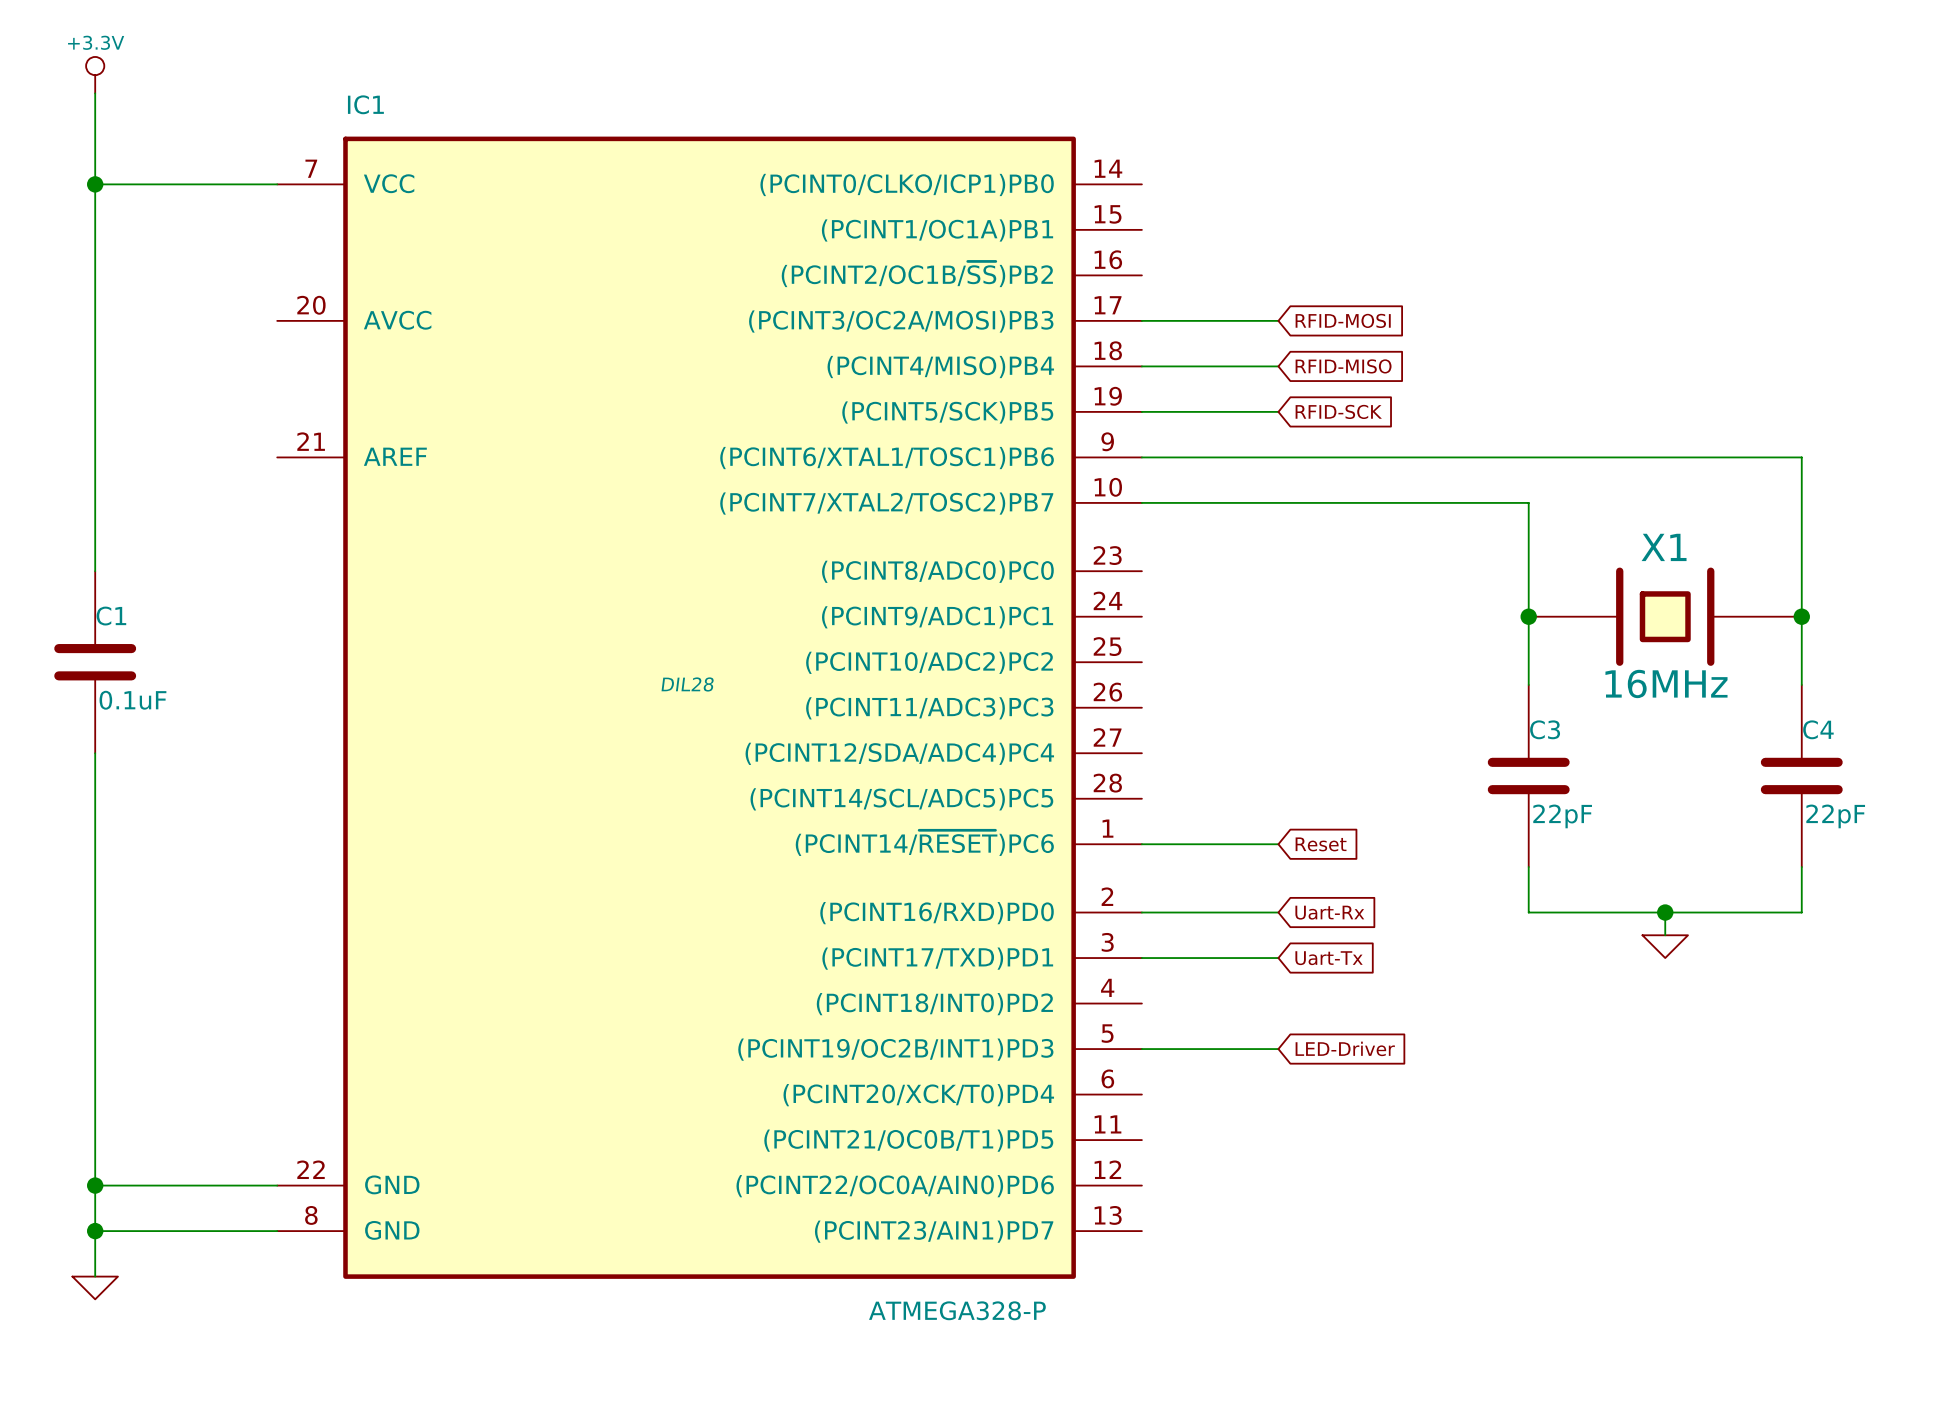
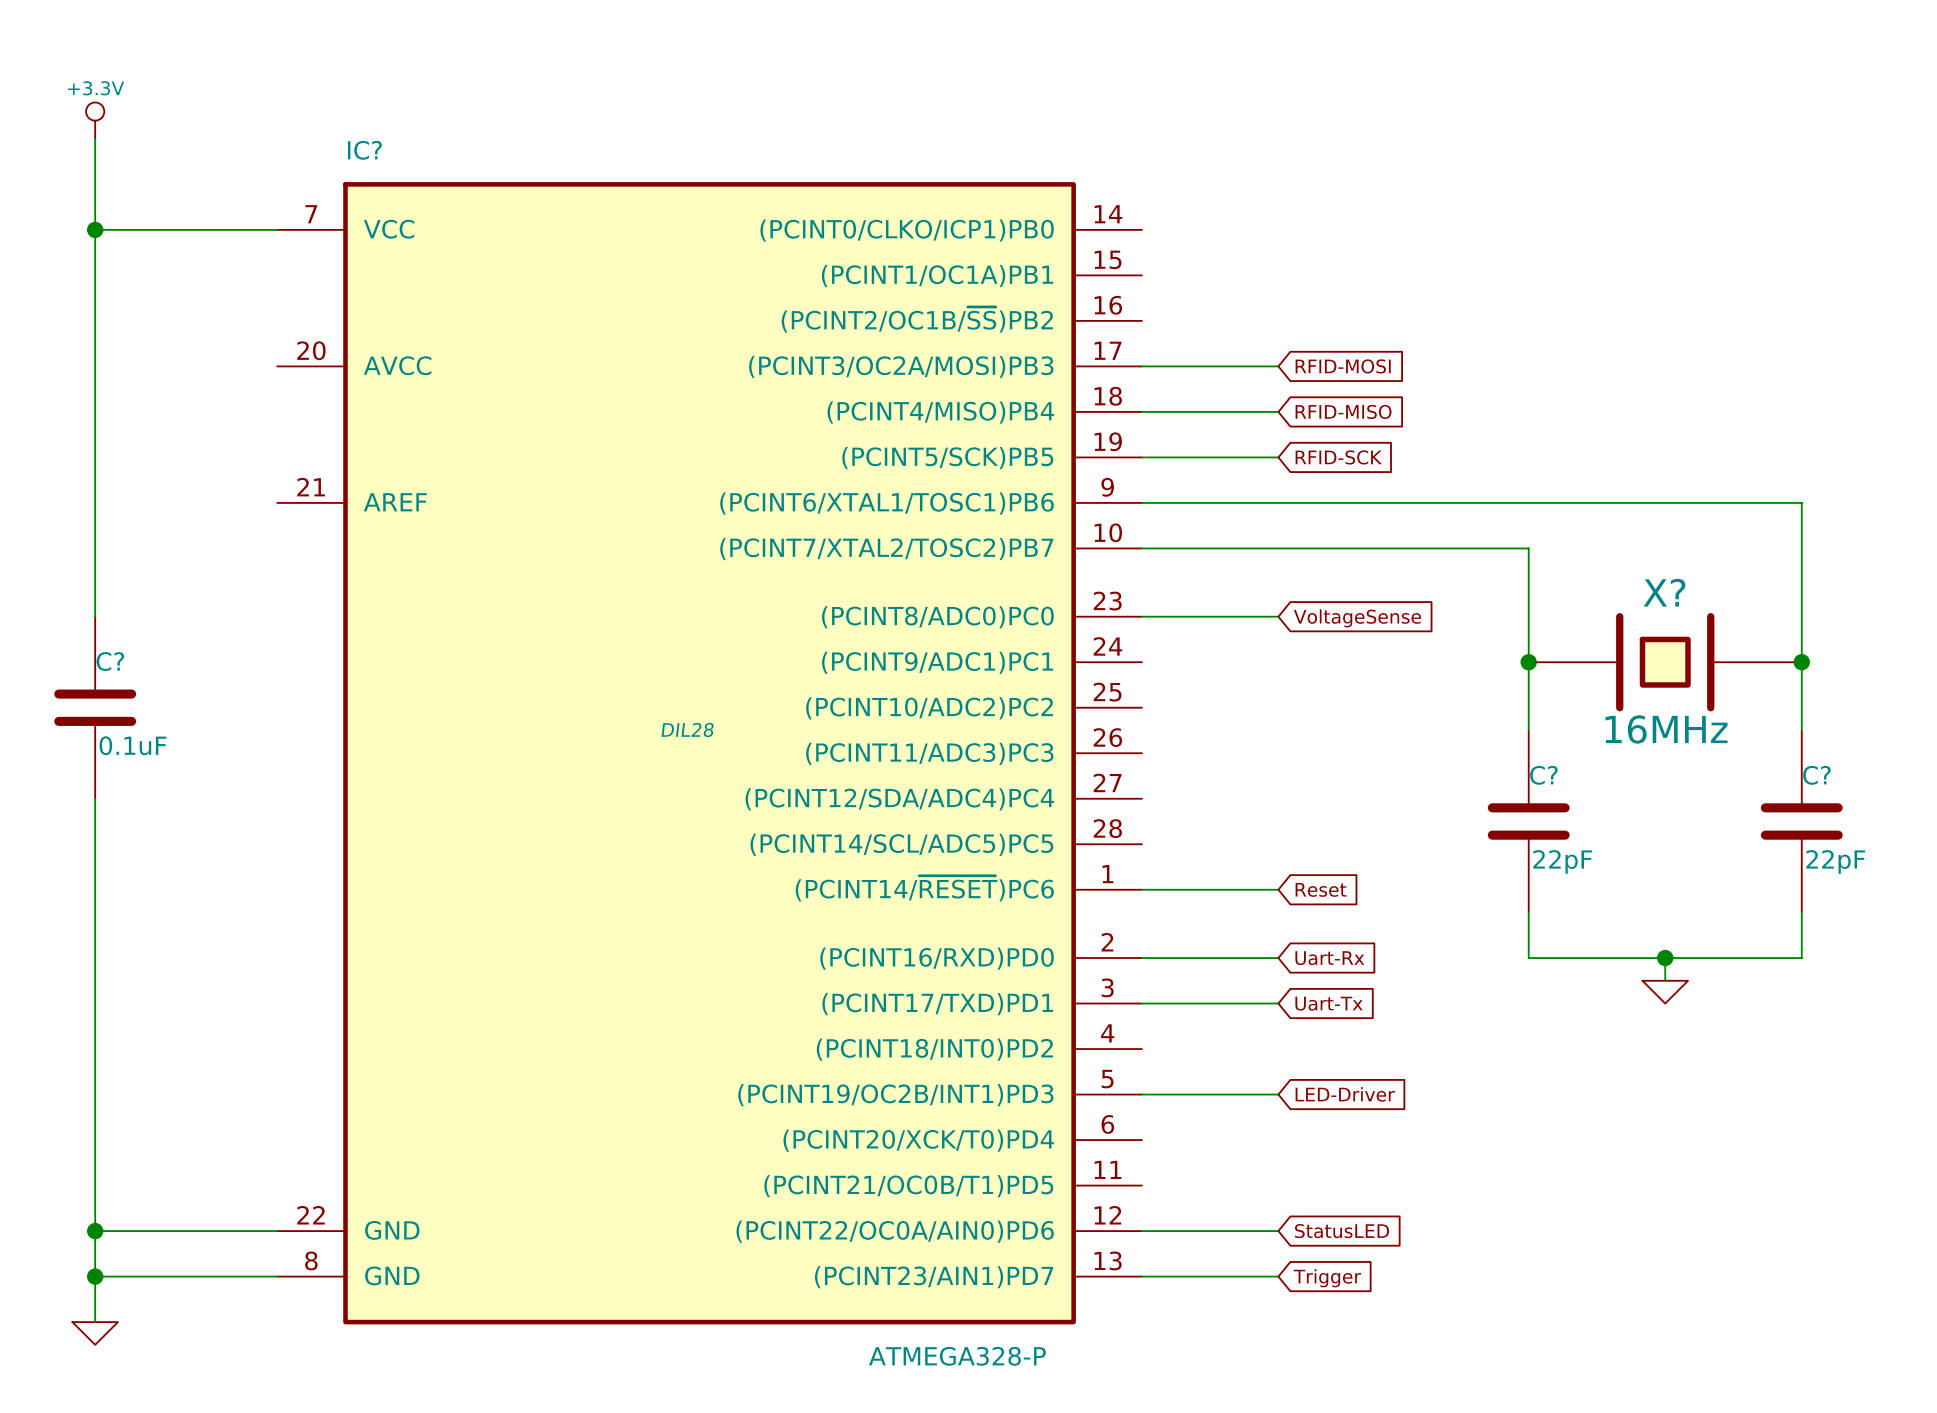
power symbol position: +3.3V (95, 75) -> +3.3V (95, 120)
wire: (95, 93) (95, 138) -> none
wire: (95, 184) (277, 184) -> (95, 229) (277, 229)
junction position: (95, 184) -> (95, 229)
wire: (1141, 320) (1278, 320) -> (1141, 616) (1278, 616)
global label: RFID-MOSI (1343, 320) -> none
global label: RFID-MISO (1343, 366) -> RFID-MOSI (1343, 366)
global label: RFID-SCK (1338, 411) -> RFID-MISO (1343, 411)
wire: (1278, 457) (1801, 457) (1801, 502) -> (1528, 502) (1801, 502)
global label: none -> RFID-SCK (1338, 457)
wire: (1528, 502) (1528, 548) -> (1141, 548) (1528, 548)
junction position: (1528, 616) -> (1528, 662)
X1: 16MHz (1665, 616) -> none
junction position: (1801, 616) -> (1801, 662)
global label: none -> VoltageSense (1357, 618)
C1: 0.1uF (95, 662) -> none
X?: none -> 16MHz (1665, 662)
C?: none -> 0.1uF (95, 707)
IC1: ATMEGA328-P (709, 707) -> none
IC?: none -> ATMEGA328-P (709, 753)
C3: 22pF (1528, 775) -> none
C4: 22pF (1801, 775) -> none
C?: none -> 22pF (1528, 821)
C?: none -> 22pF (1801, 821)
wire: (1141, 844) (1278, 844) -> (1141, 889) (1278, 889)
global label position: Reset (1321, 844) -> Reset (1321, 889)
wire: (1528, 867) (1528, 912) (1801, 912) (1801, 867) -> (1528, 912) (1528, 958) (1801, 958) (1801, 912)
wire: (1141, 912) (1278, 912) -> (1141, 1003) (1278, 1003)
global label: Uart-Rx (1329, 912) -> none
wire: (1665, 912) (1665, 935) -> (1665, 958) (1665, 980)
junction position: (1665, 912) -> (1665, 958)
power symbol position: (1665, 946) -> (1665, 992)
global label: Uart-Tx (1329, 958) -> Uart-Rx (1329, 958)
global label: none -> Uart-Tx (1329, 1003)
global label position: LED-Driver (1345, 1048) -> LED-Driver (1345, 1094)
wire: (1141, 1049) (1278, 1049) -> (1141, 1094) (1278, 1094)
wire: (95, 1185) (277, 1185) -> none
junction position: (95, 1185) -> (95, 1276)
wire: none -> (1141, 1231) (1278, 1231)
global label: none -> StatusLED (1342, 1231)
wire: none -> (277, 1276) (95, 1276) (95, 1322)
wire: none -> (1141, 1276) (1278, 1276)
global label: none -> Trigger (1327, 1278)
power symbol position: (95, 1287) -> (95, 1333)

